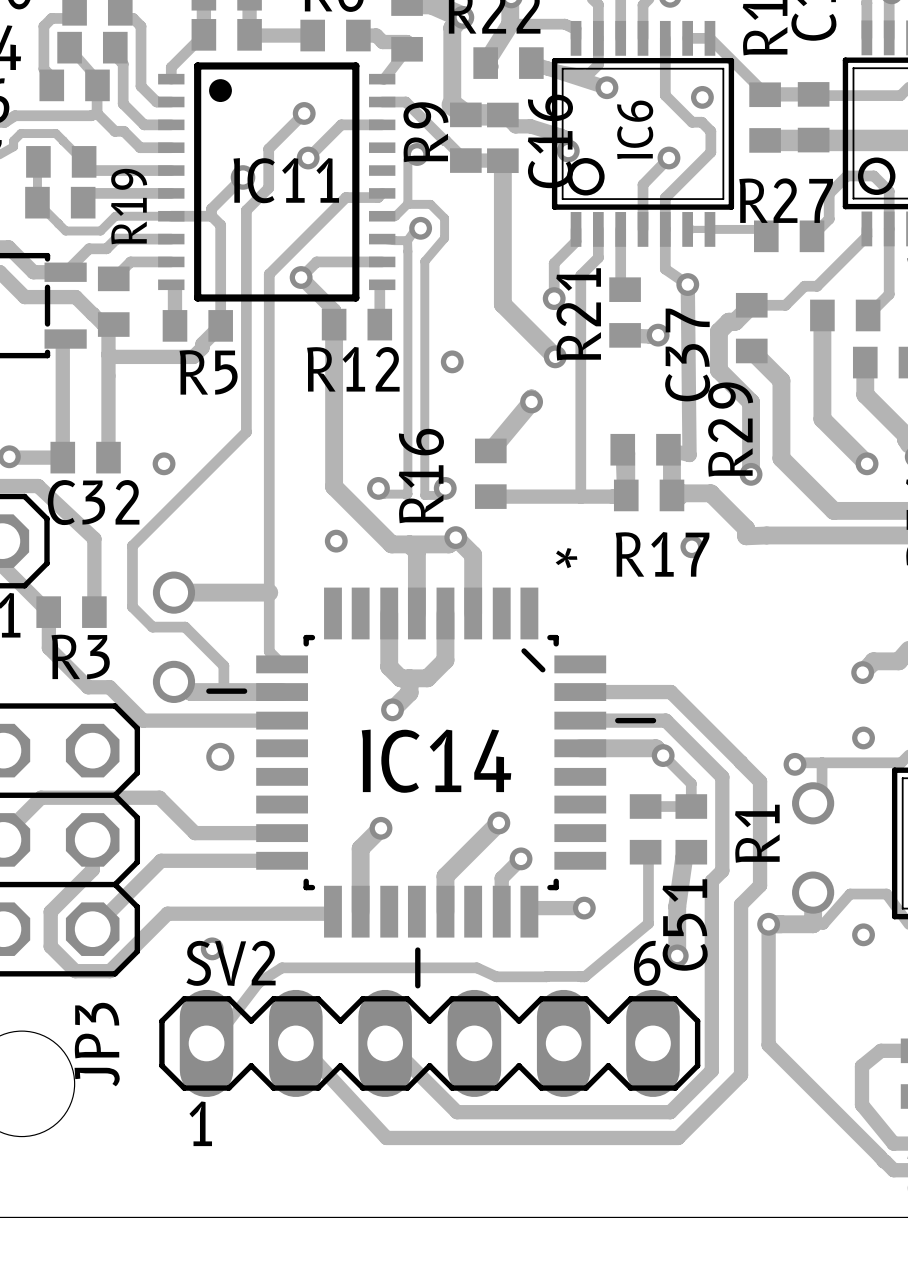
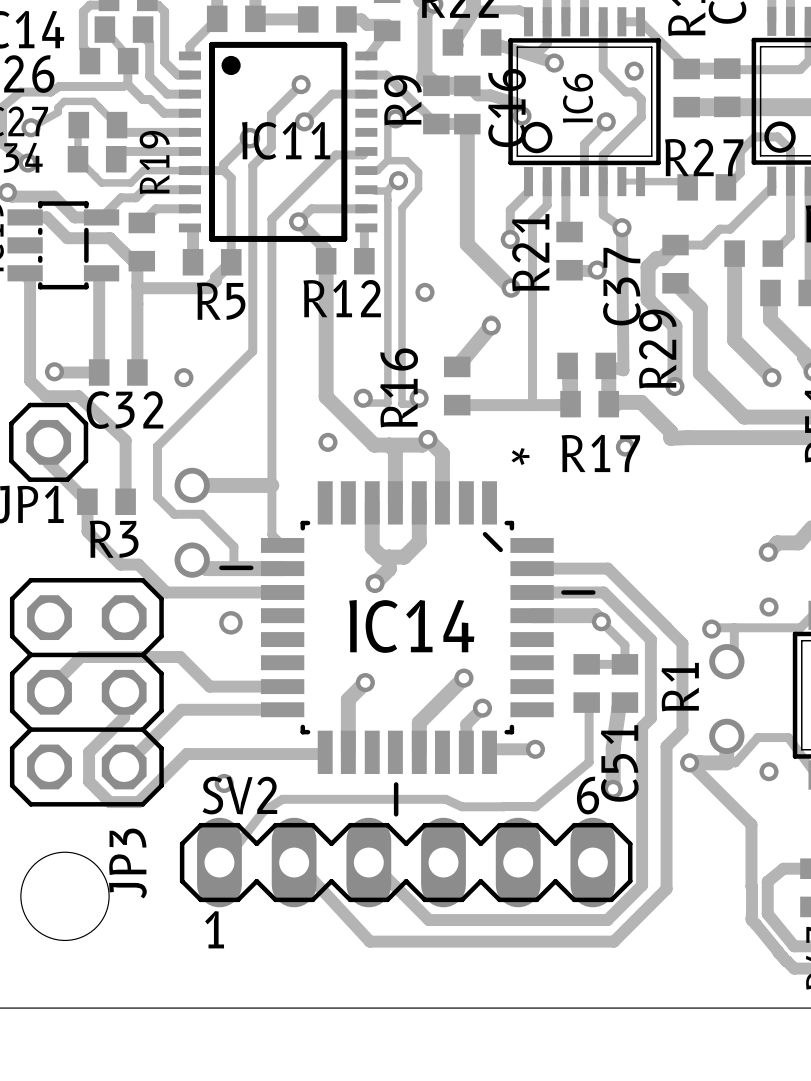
track: (768, 924) (768, 1045) (874, 1151) -> (689, 762) (751, 824) (751, 918) (778, 952)

